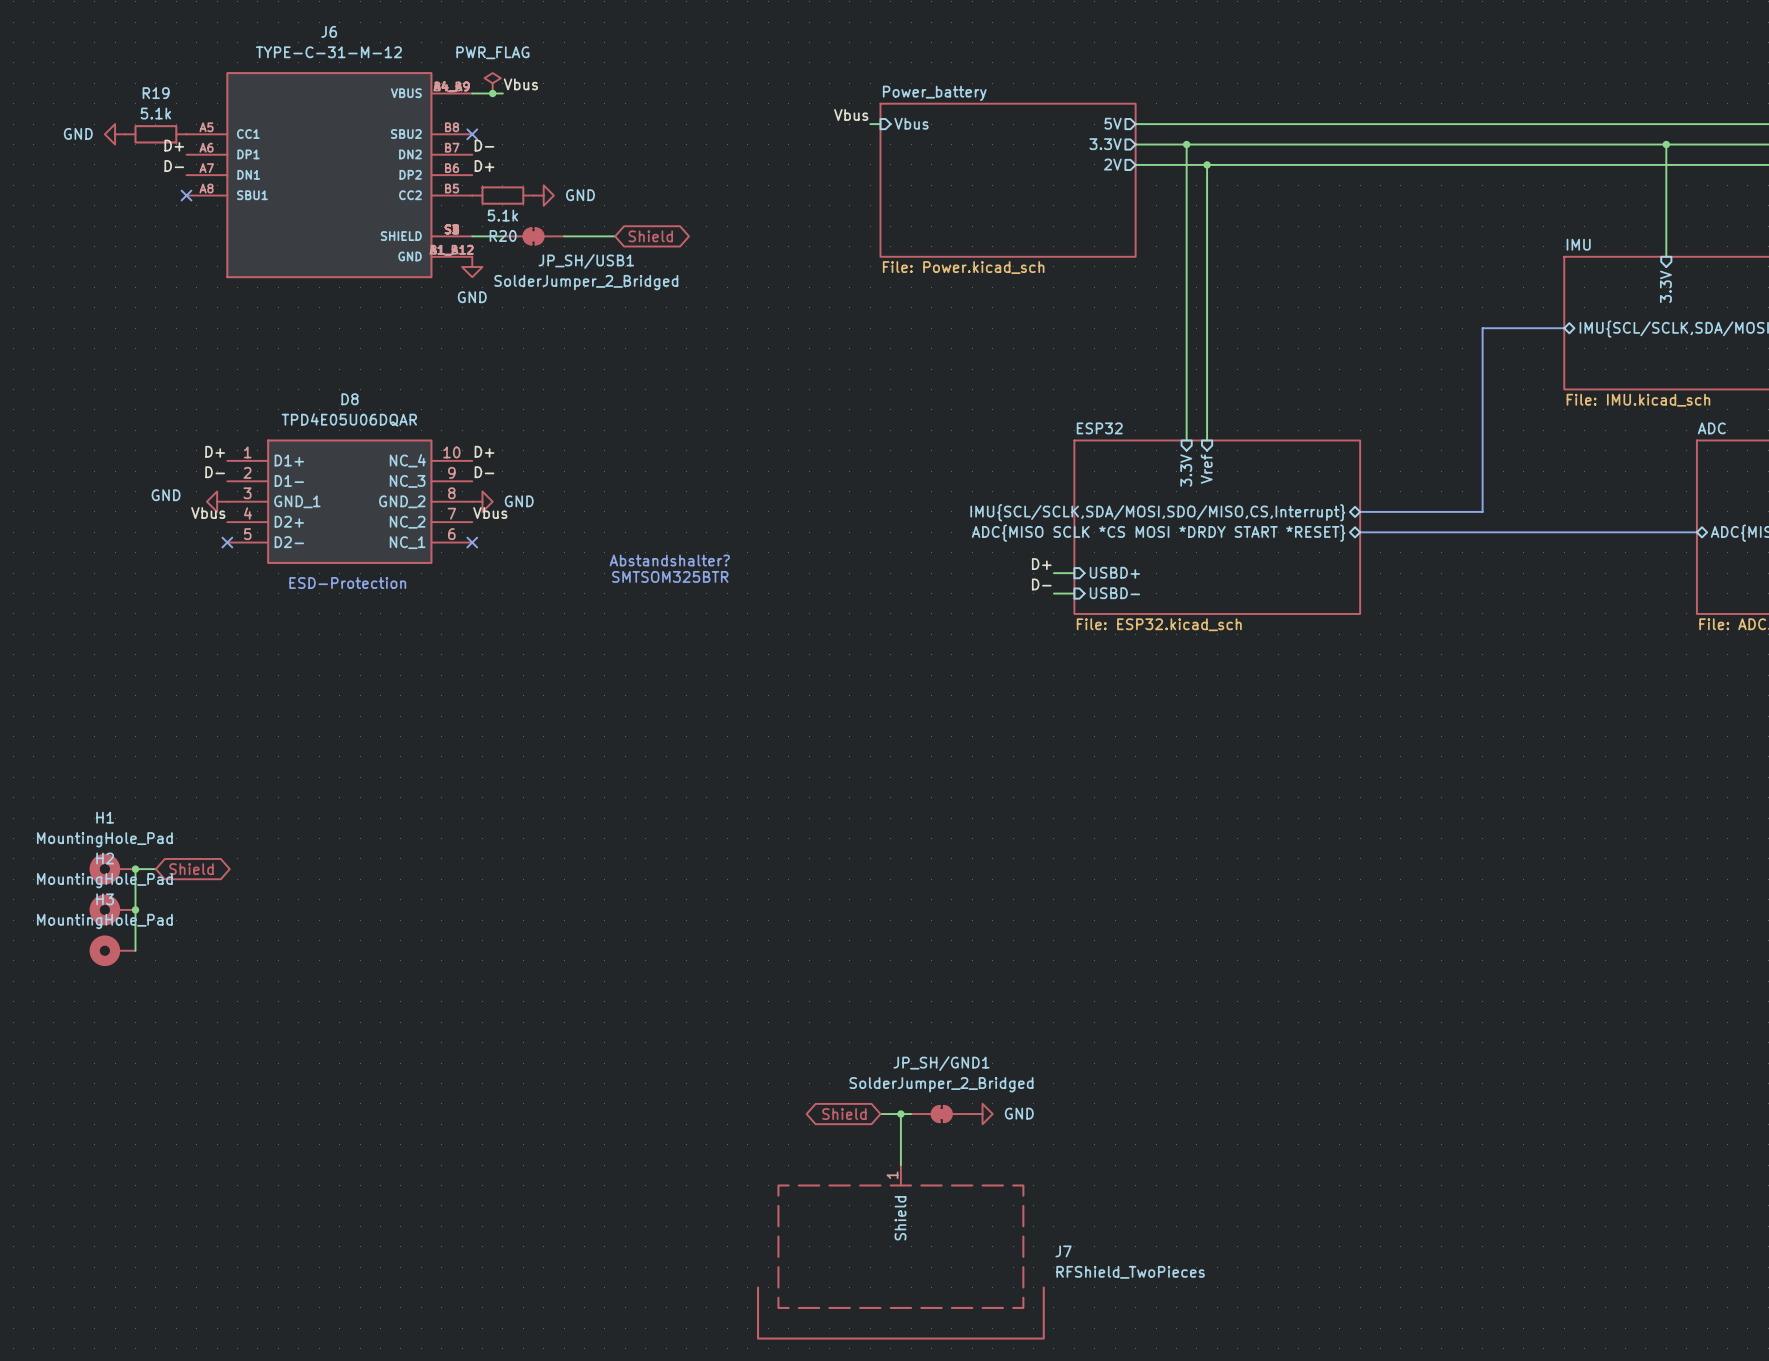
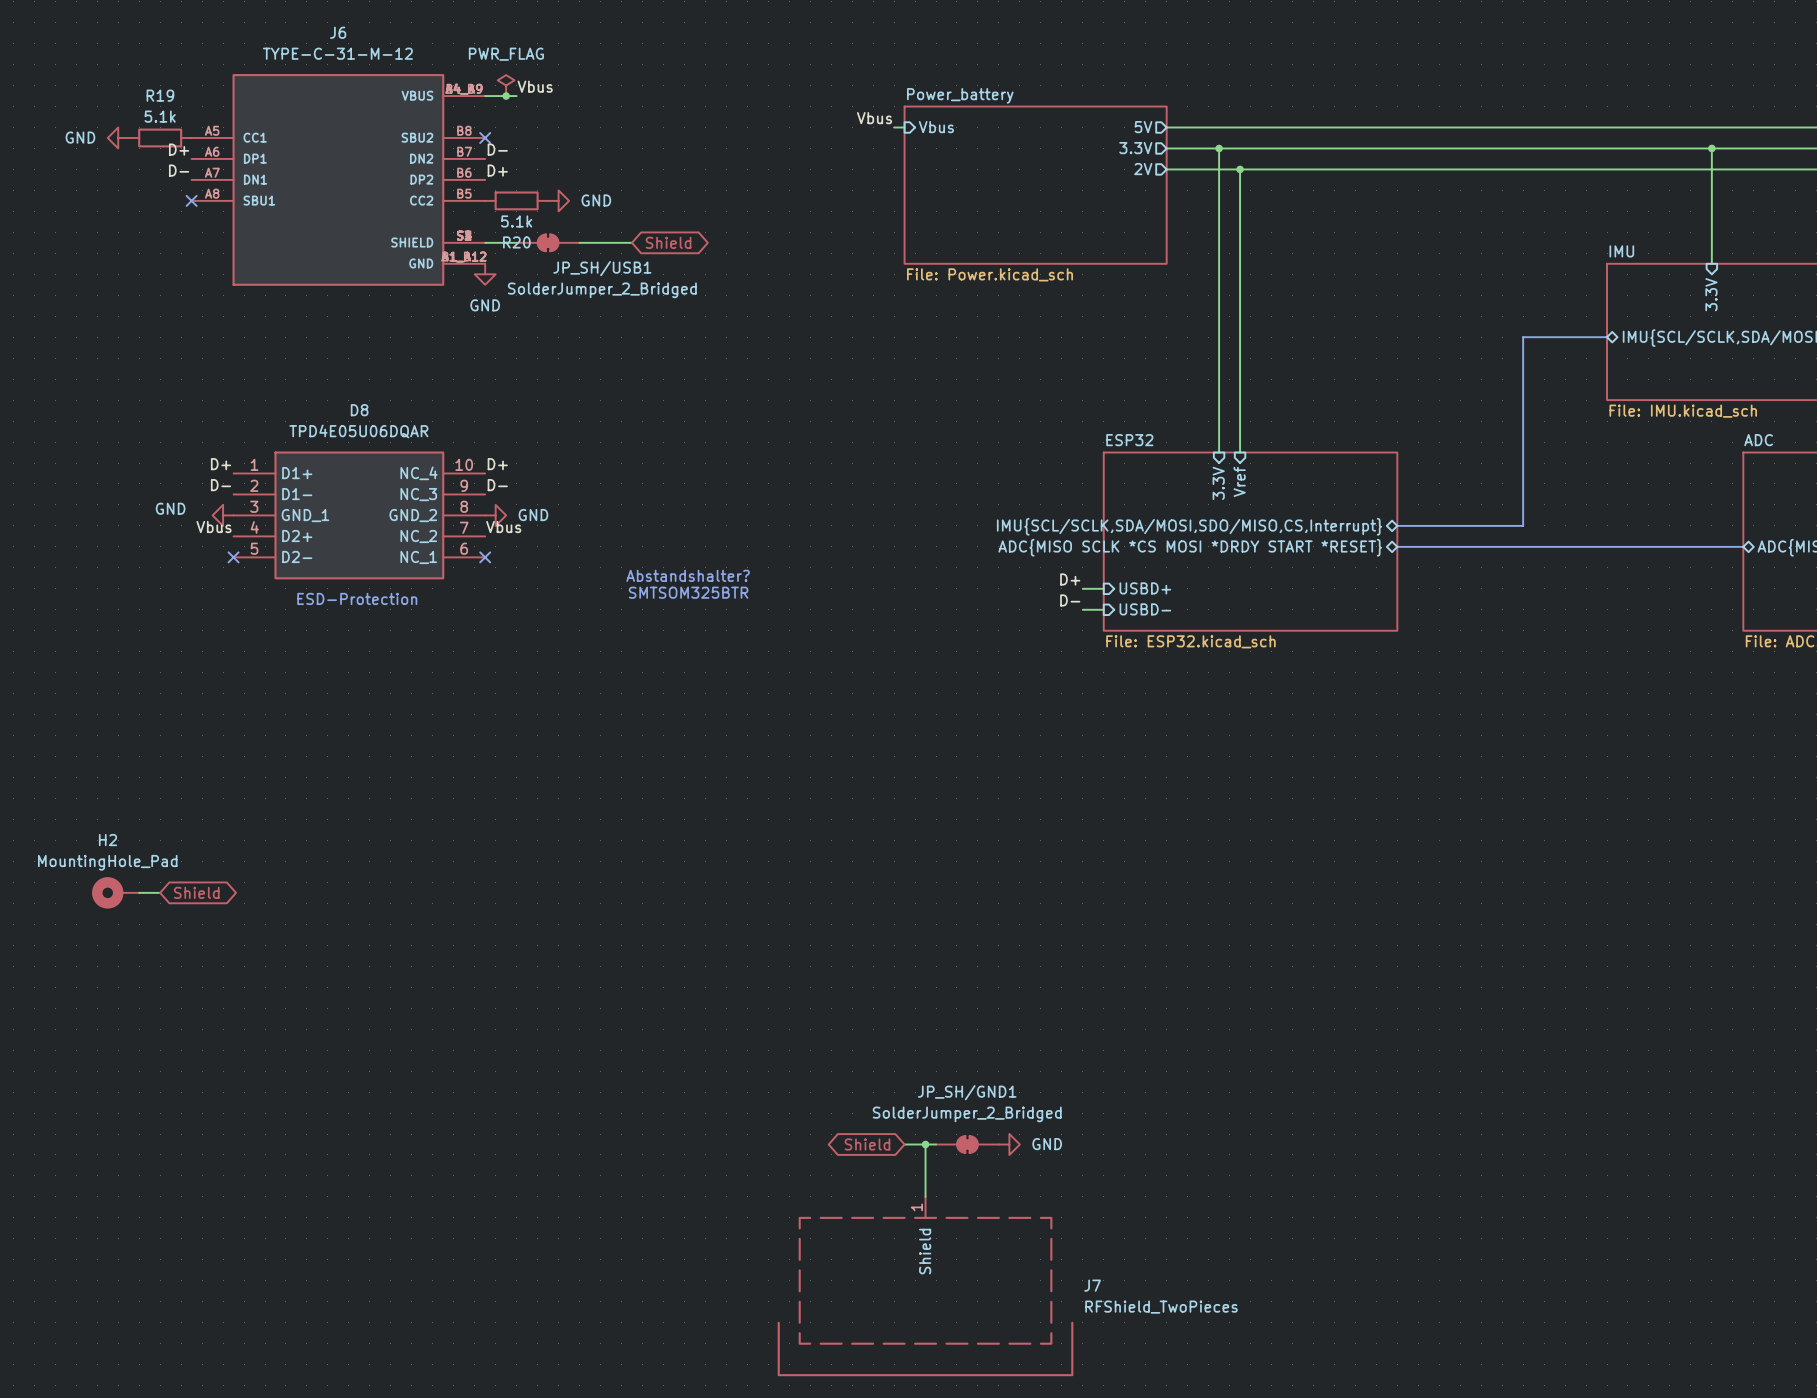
H1 name: H1 (105, 817) -> H2 (107, 840)
wire: (135, 869) (135, 950) -> none
junction: (135, 869) -> none
H2: MountingHole_Pad (112, 909) -> none
junction: (135, 909) -> none
H3: MountingHole_Pad (112, 950) -> none

